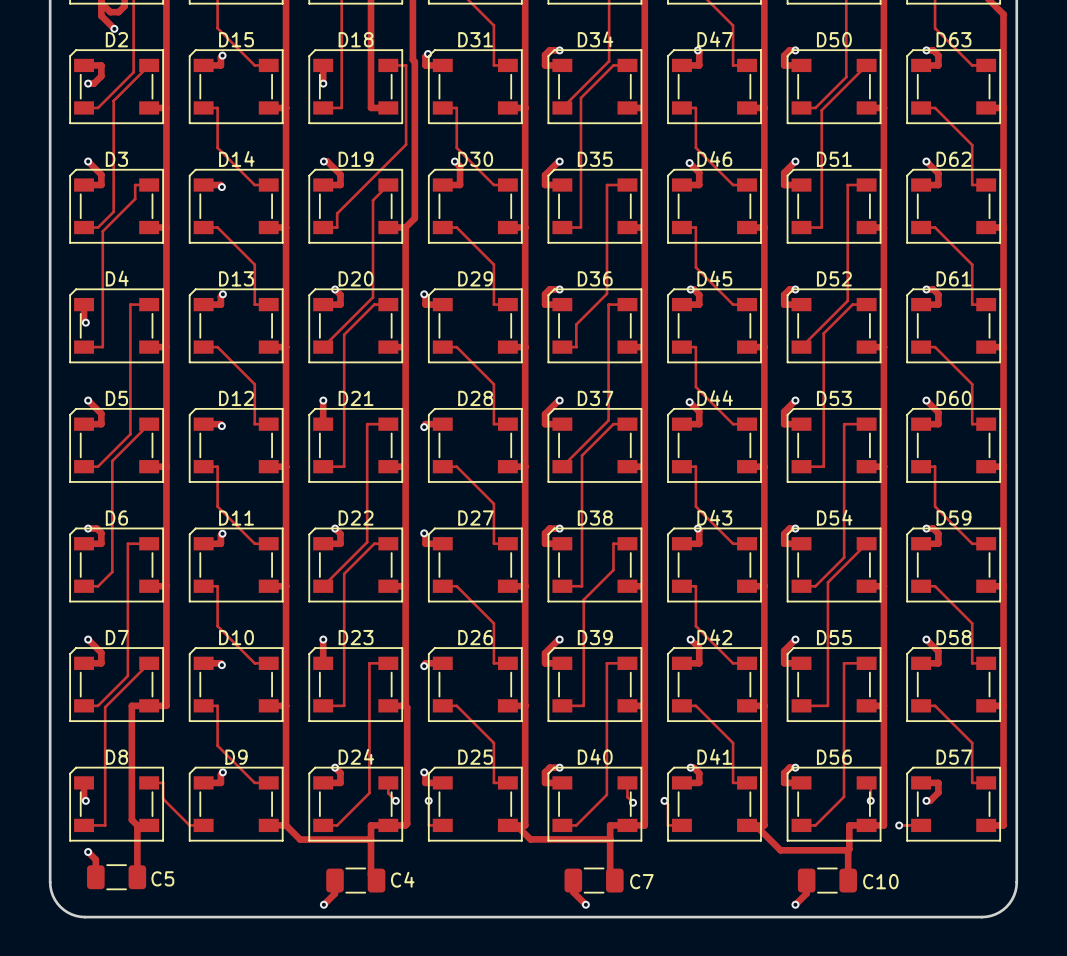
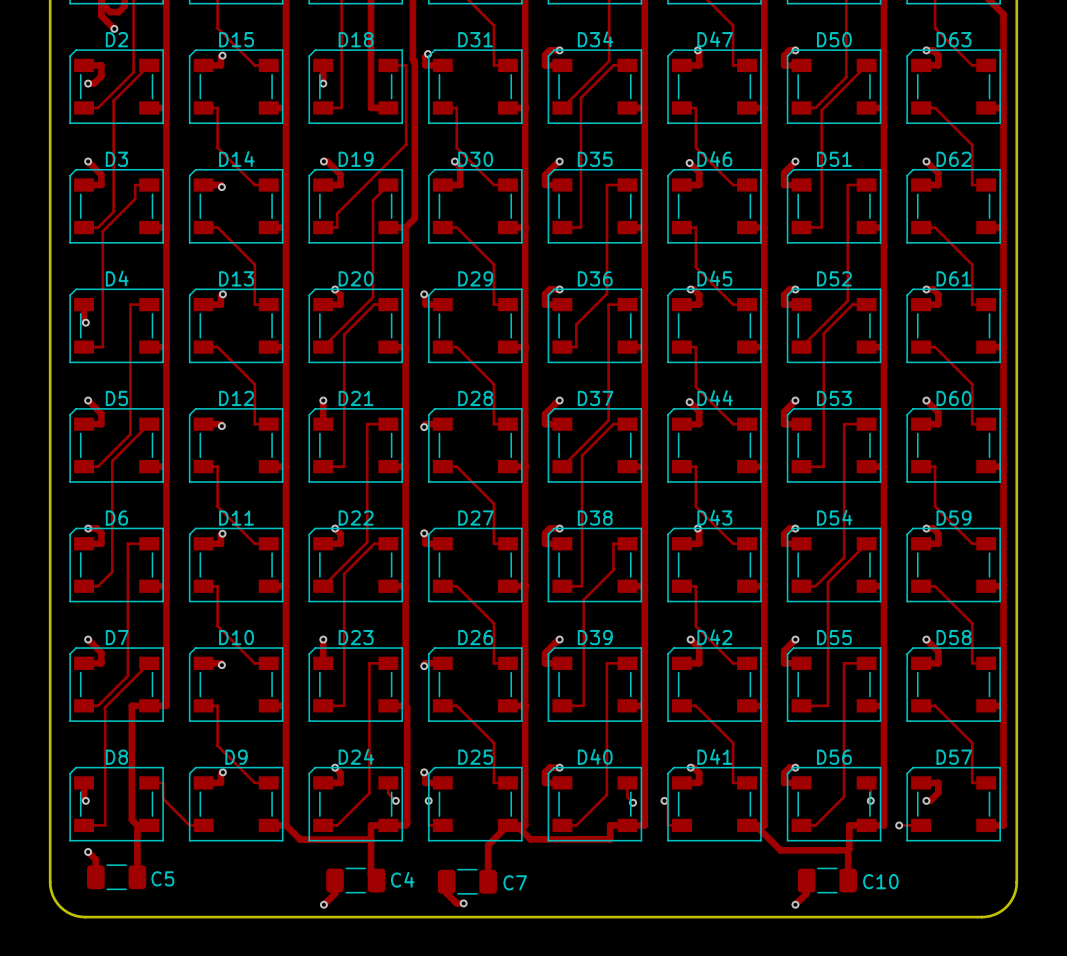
track: none -> (507, 825) (488, 845) (488, 881) (483, 877)
track: (610, 839) (610, 875) (614, 880) -> none
track: (573, 880) (573, 892) (585, 904) -> none
C7 position: (594, 880) -> (467, 881)
track: none -> (446, 881) (446, 893) (456, 903) (463, 903)
via: none -> (463, 903)
via: (585, 904) -> none

